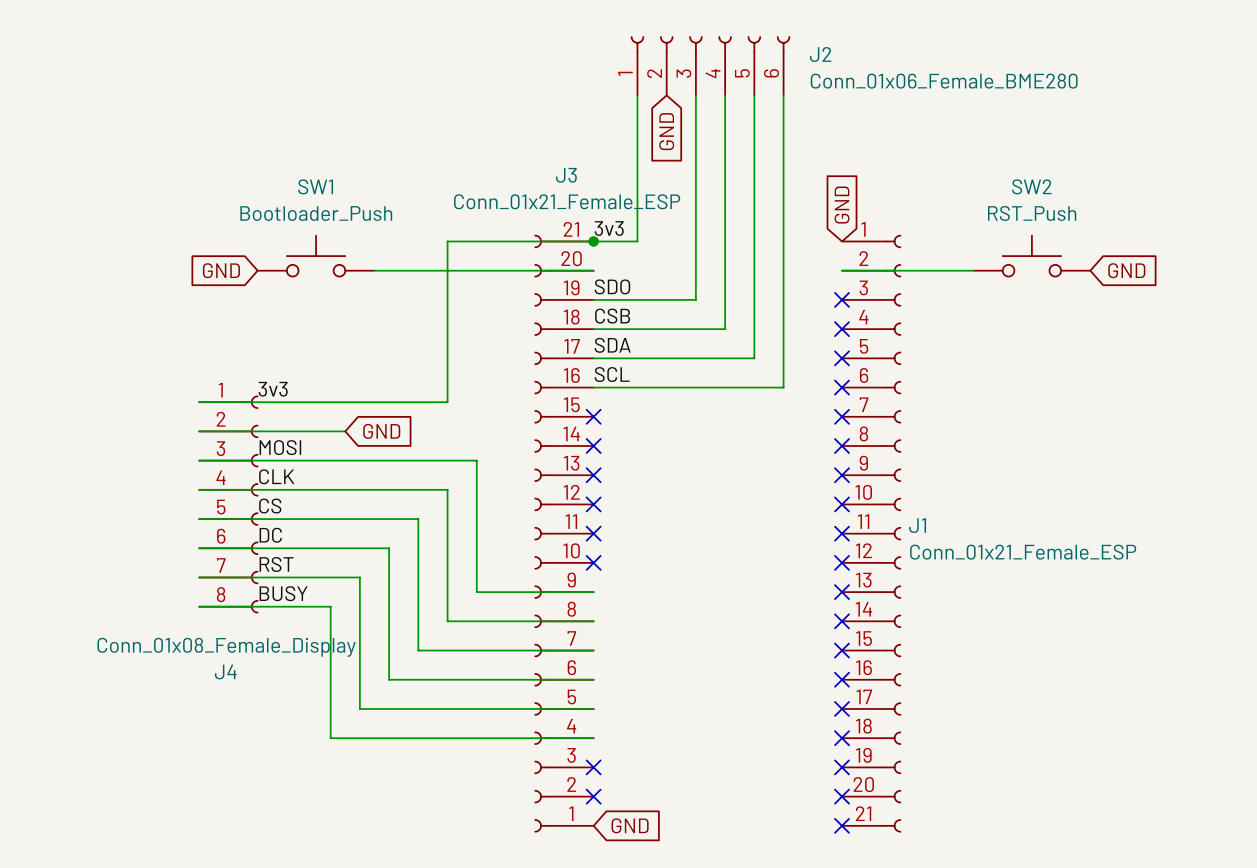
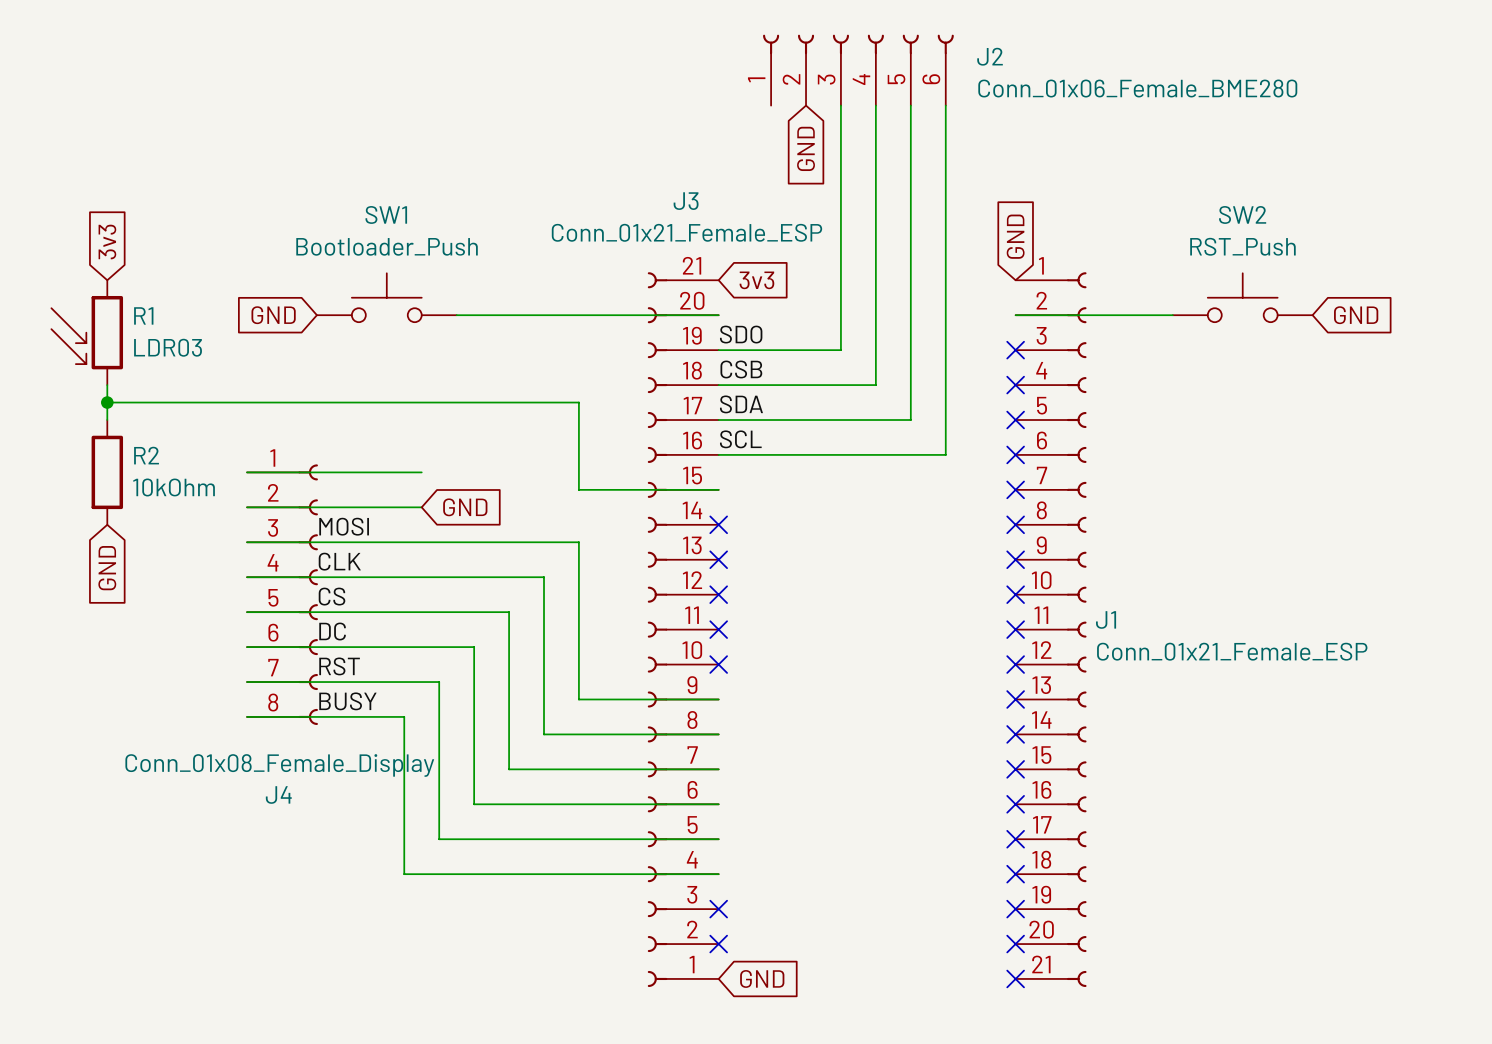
wire: (637, 95) (637, 241) (447, 241) (447, 402) (345, 402) -> none
global label: none -> 3v3 (107, 242)
label: 3v3 (609, 228) -> none
junction: (593, 241) -> none
global label: none -> 3v3 (756, 280)
R1: none -> LDR03 (87, 332)
wire: none -> (107, 385) (107, 420)
wire: none -> (107, 402) (578, 402) (578, 489) (718, 489)
junction: none -> (107, 402)
label: 3v3 (273, 389) -> none
R2: none -> 10kOhm (107, 472)
no-connect mark: (593, 416) -> none
global label: none -> GND (107, 568)

